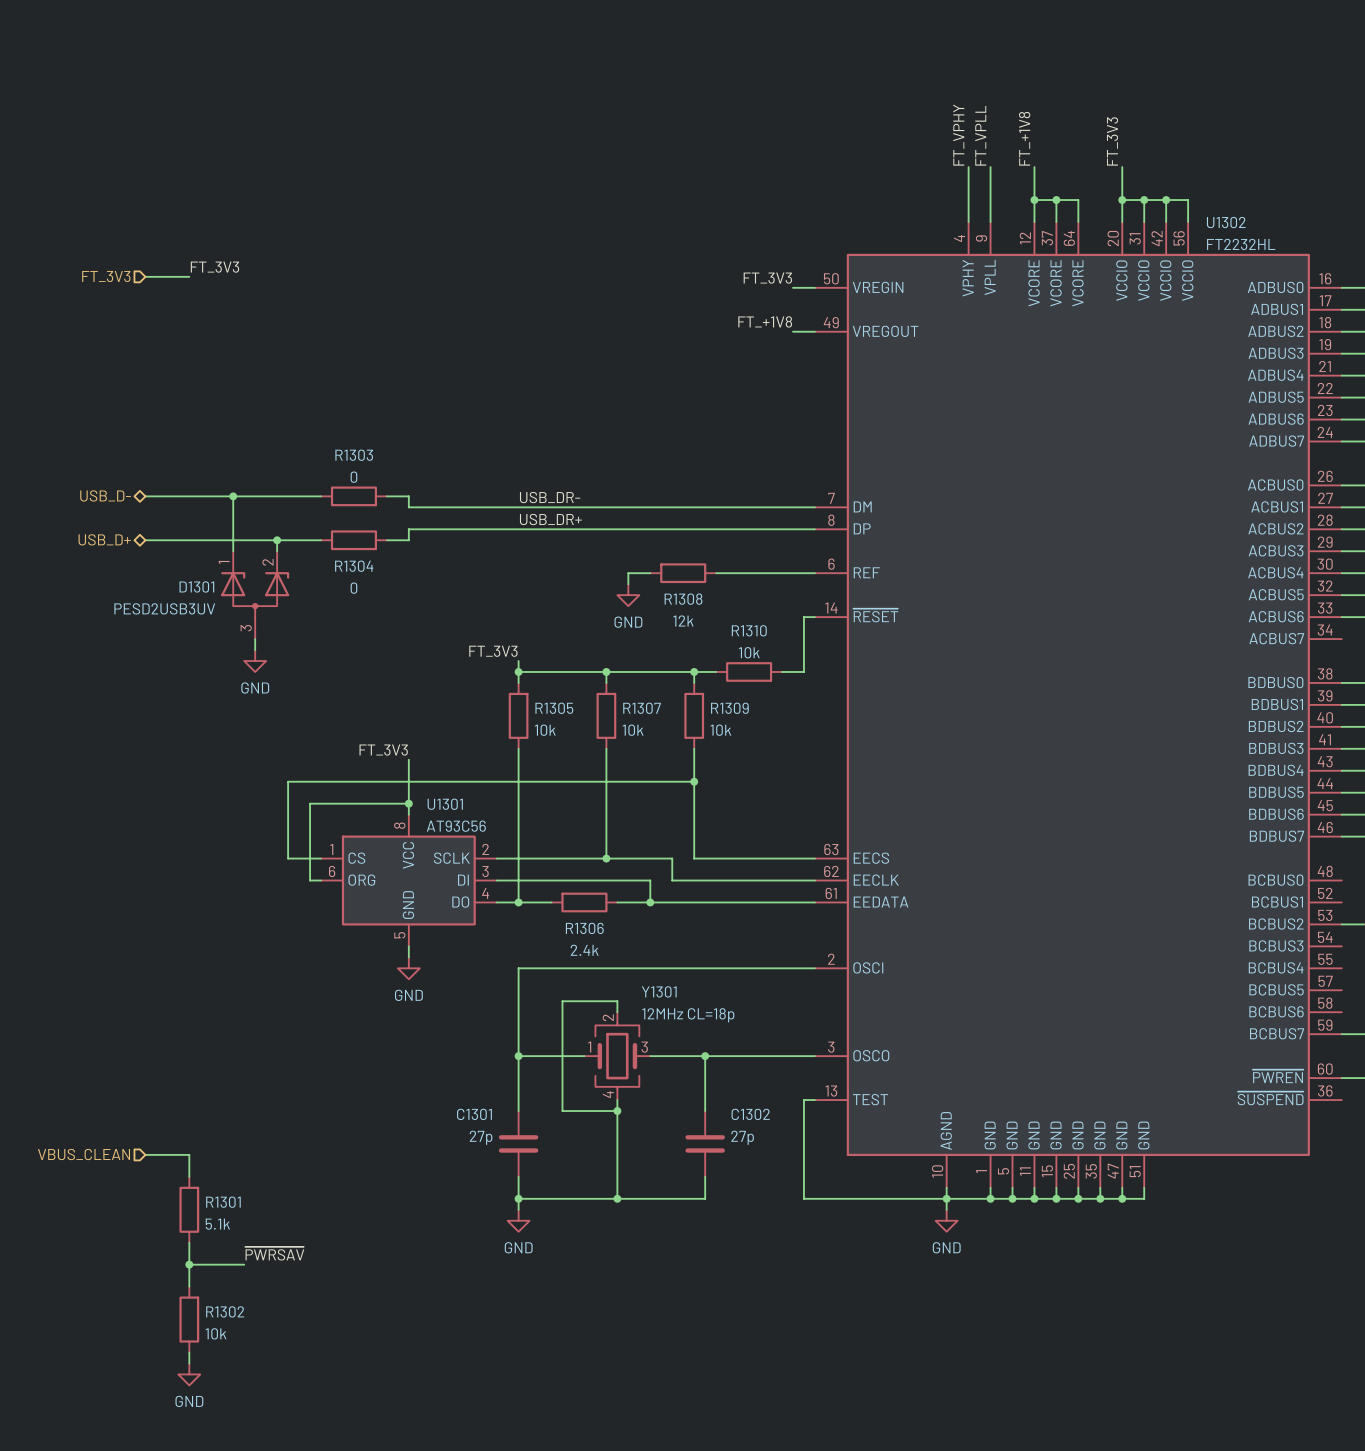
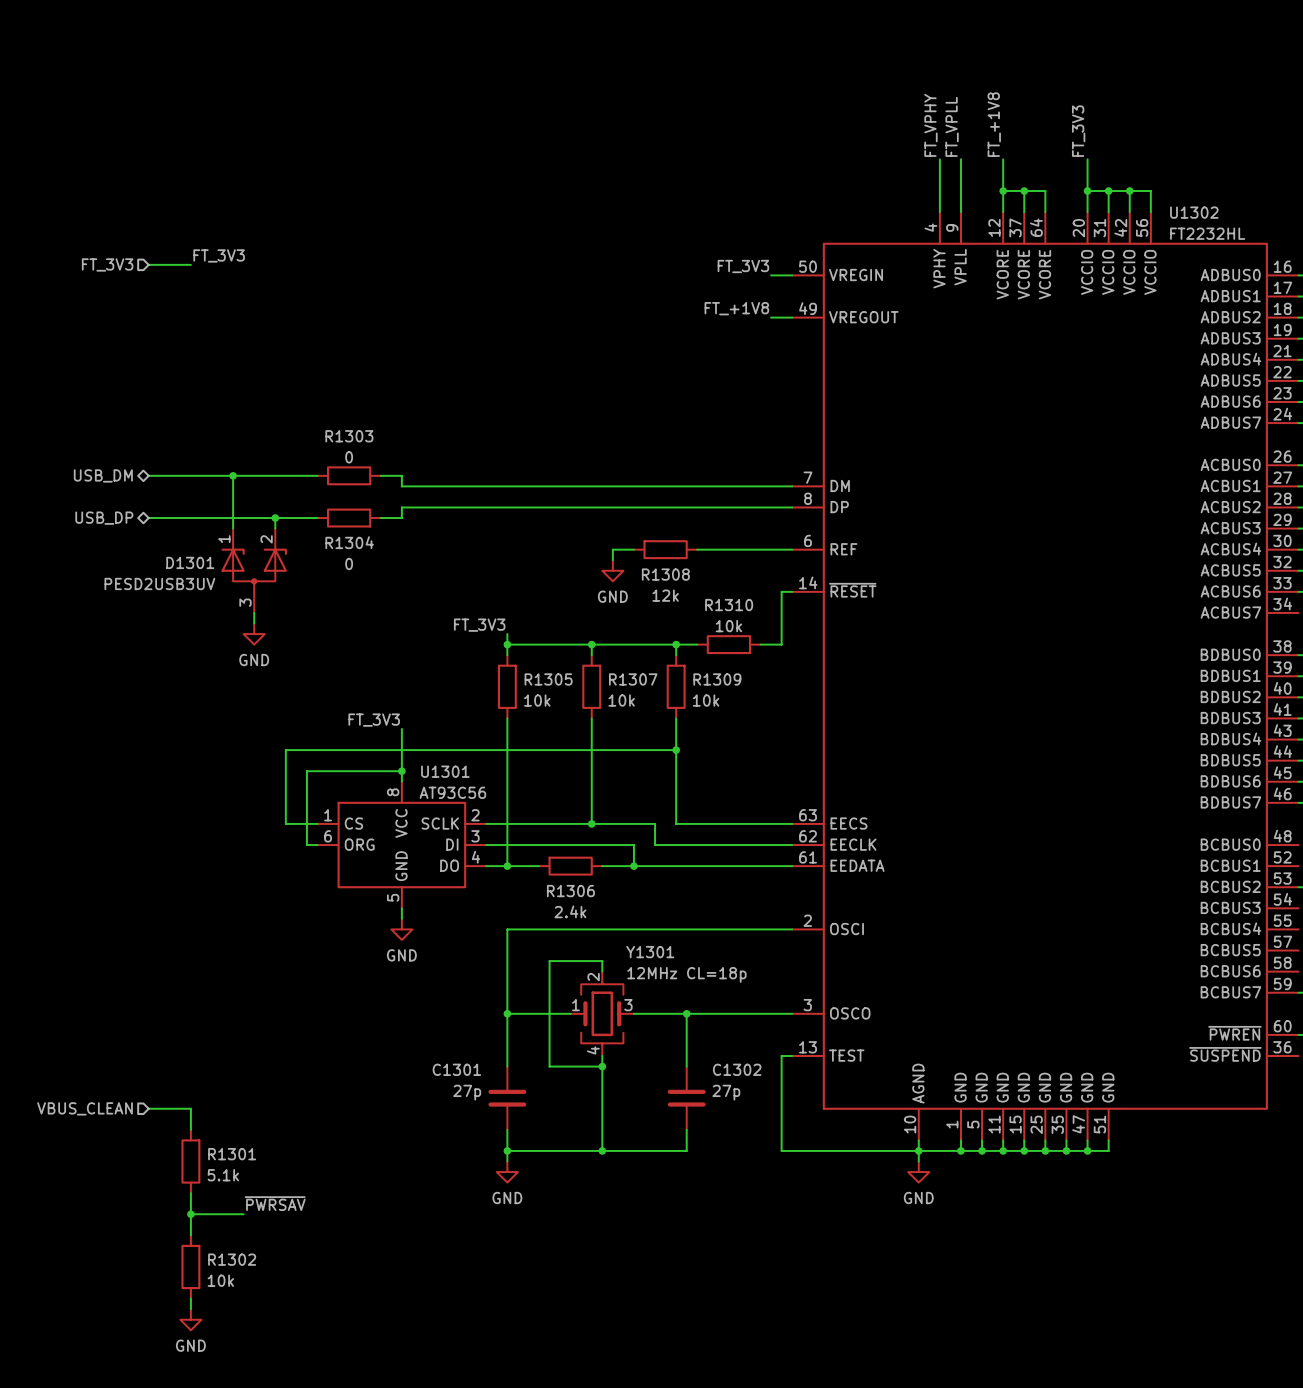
hierarchical label: USB_D- (105, 495) -> USB_DM (103, 475)
label: USB_DR- (550, 497) -> none
label: USB_DR+ (550, 519) -> none
hierarchical label: USB_D+ (104, 539) -> USB_DP (104, 518)

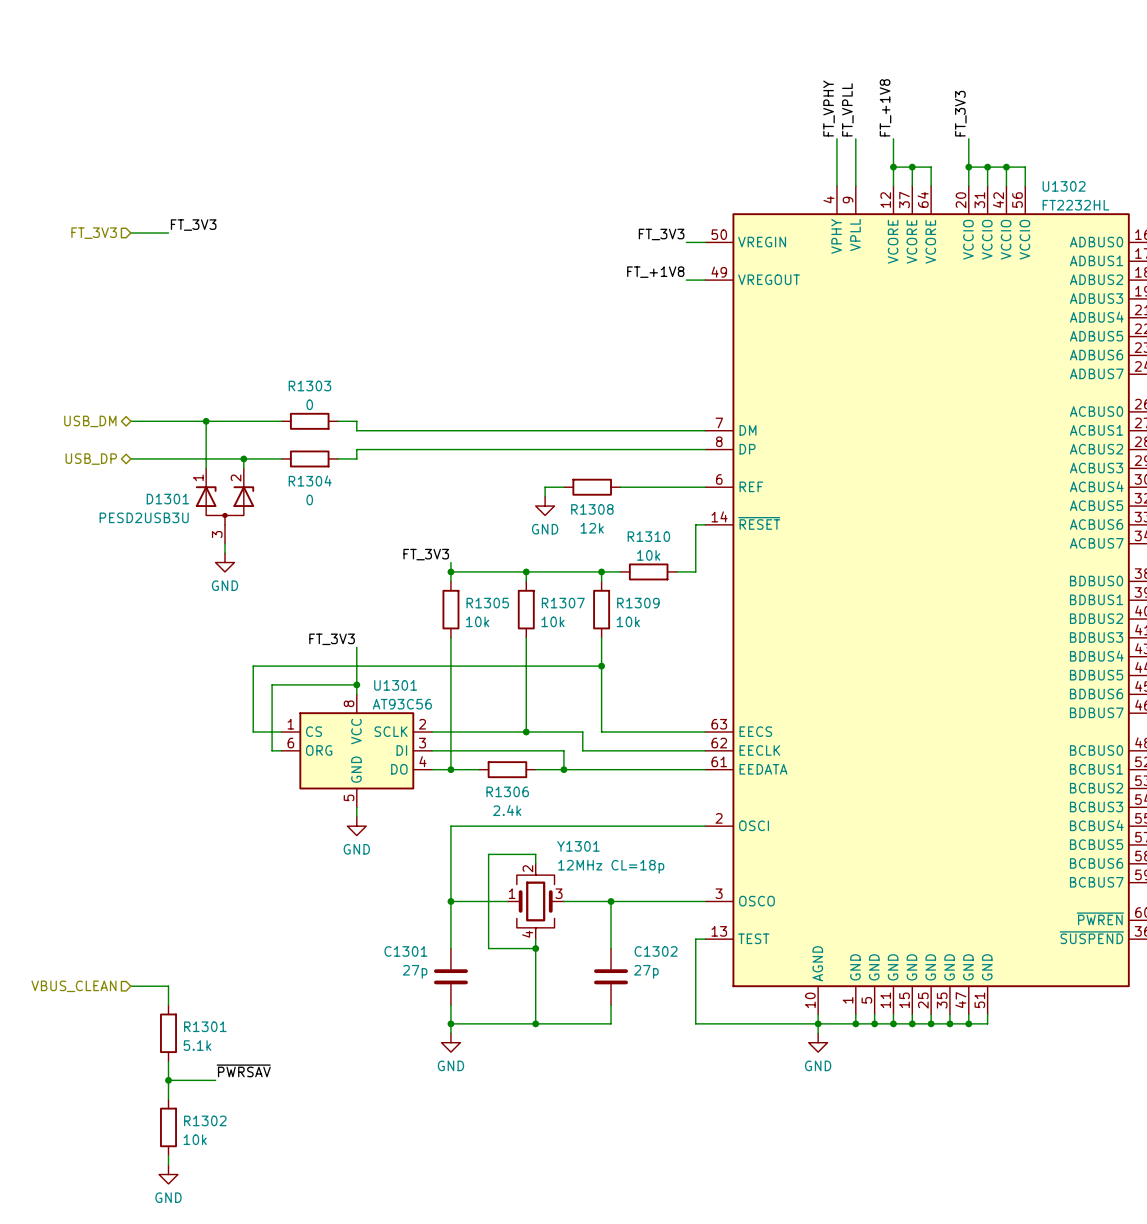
D1301 value: PESD2USB3UV (159, 583) -> PESD2USB3U (144, 517)

